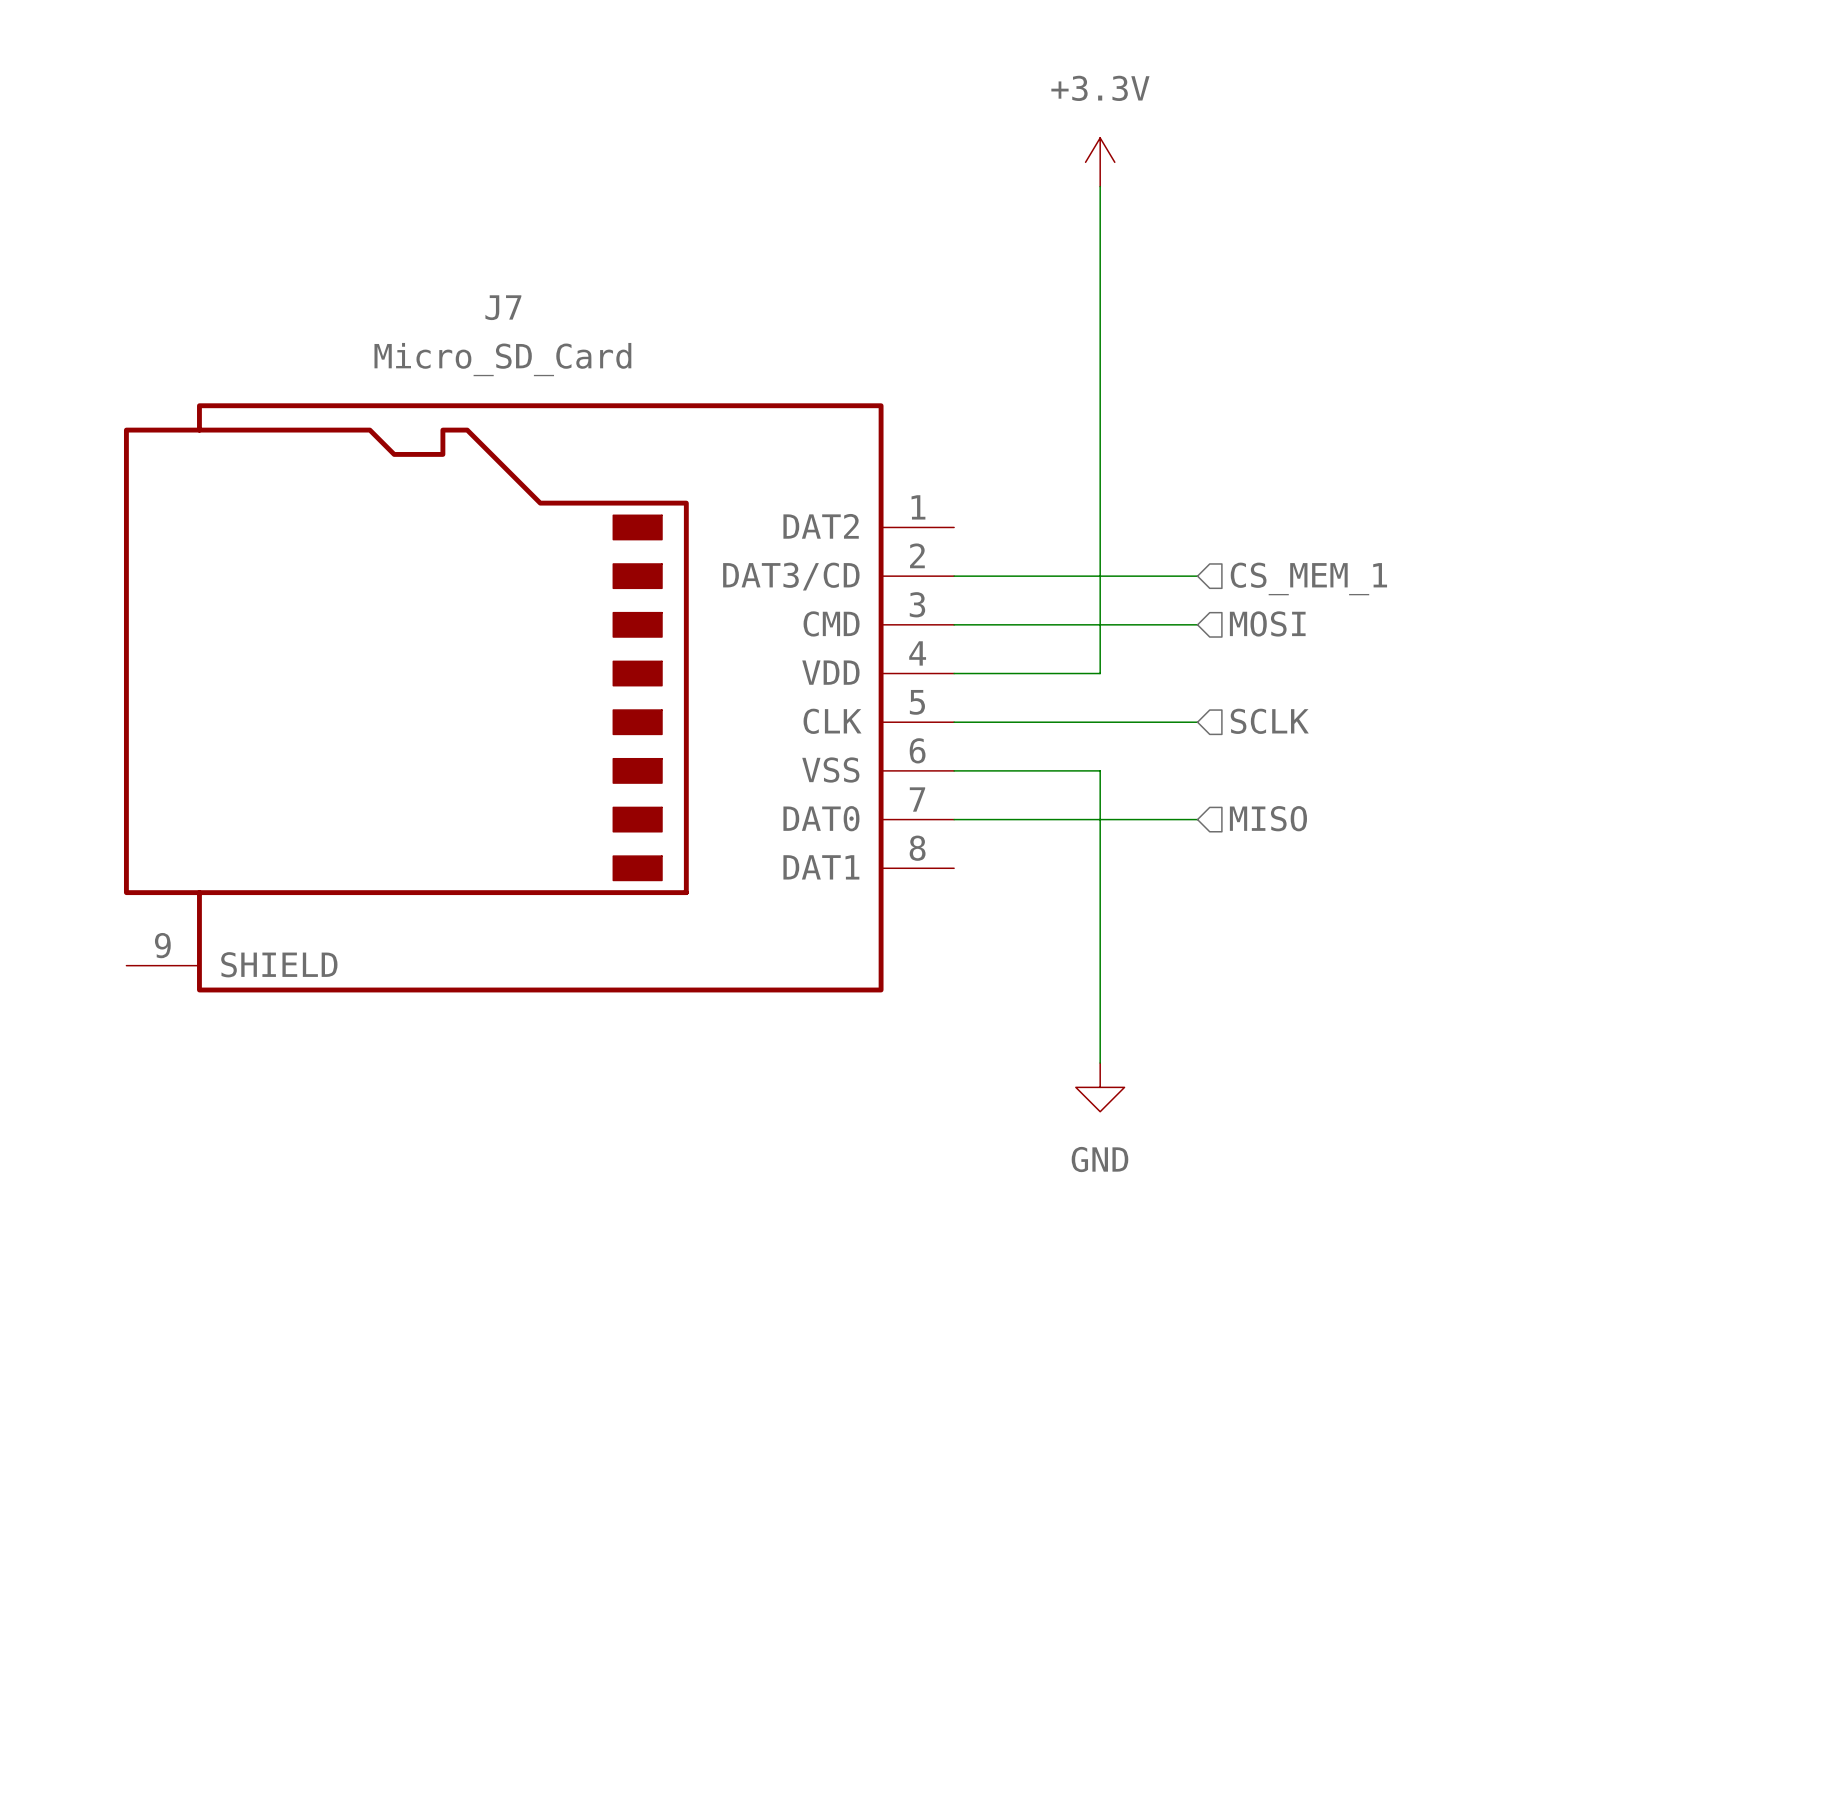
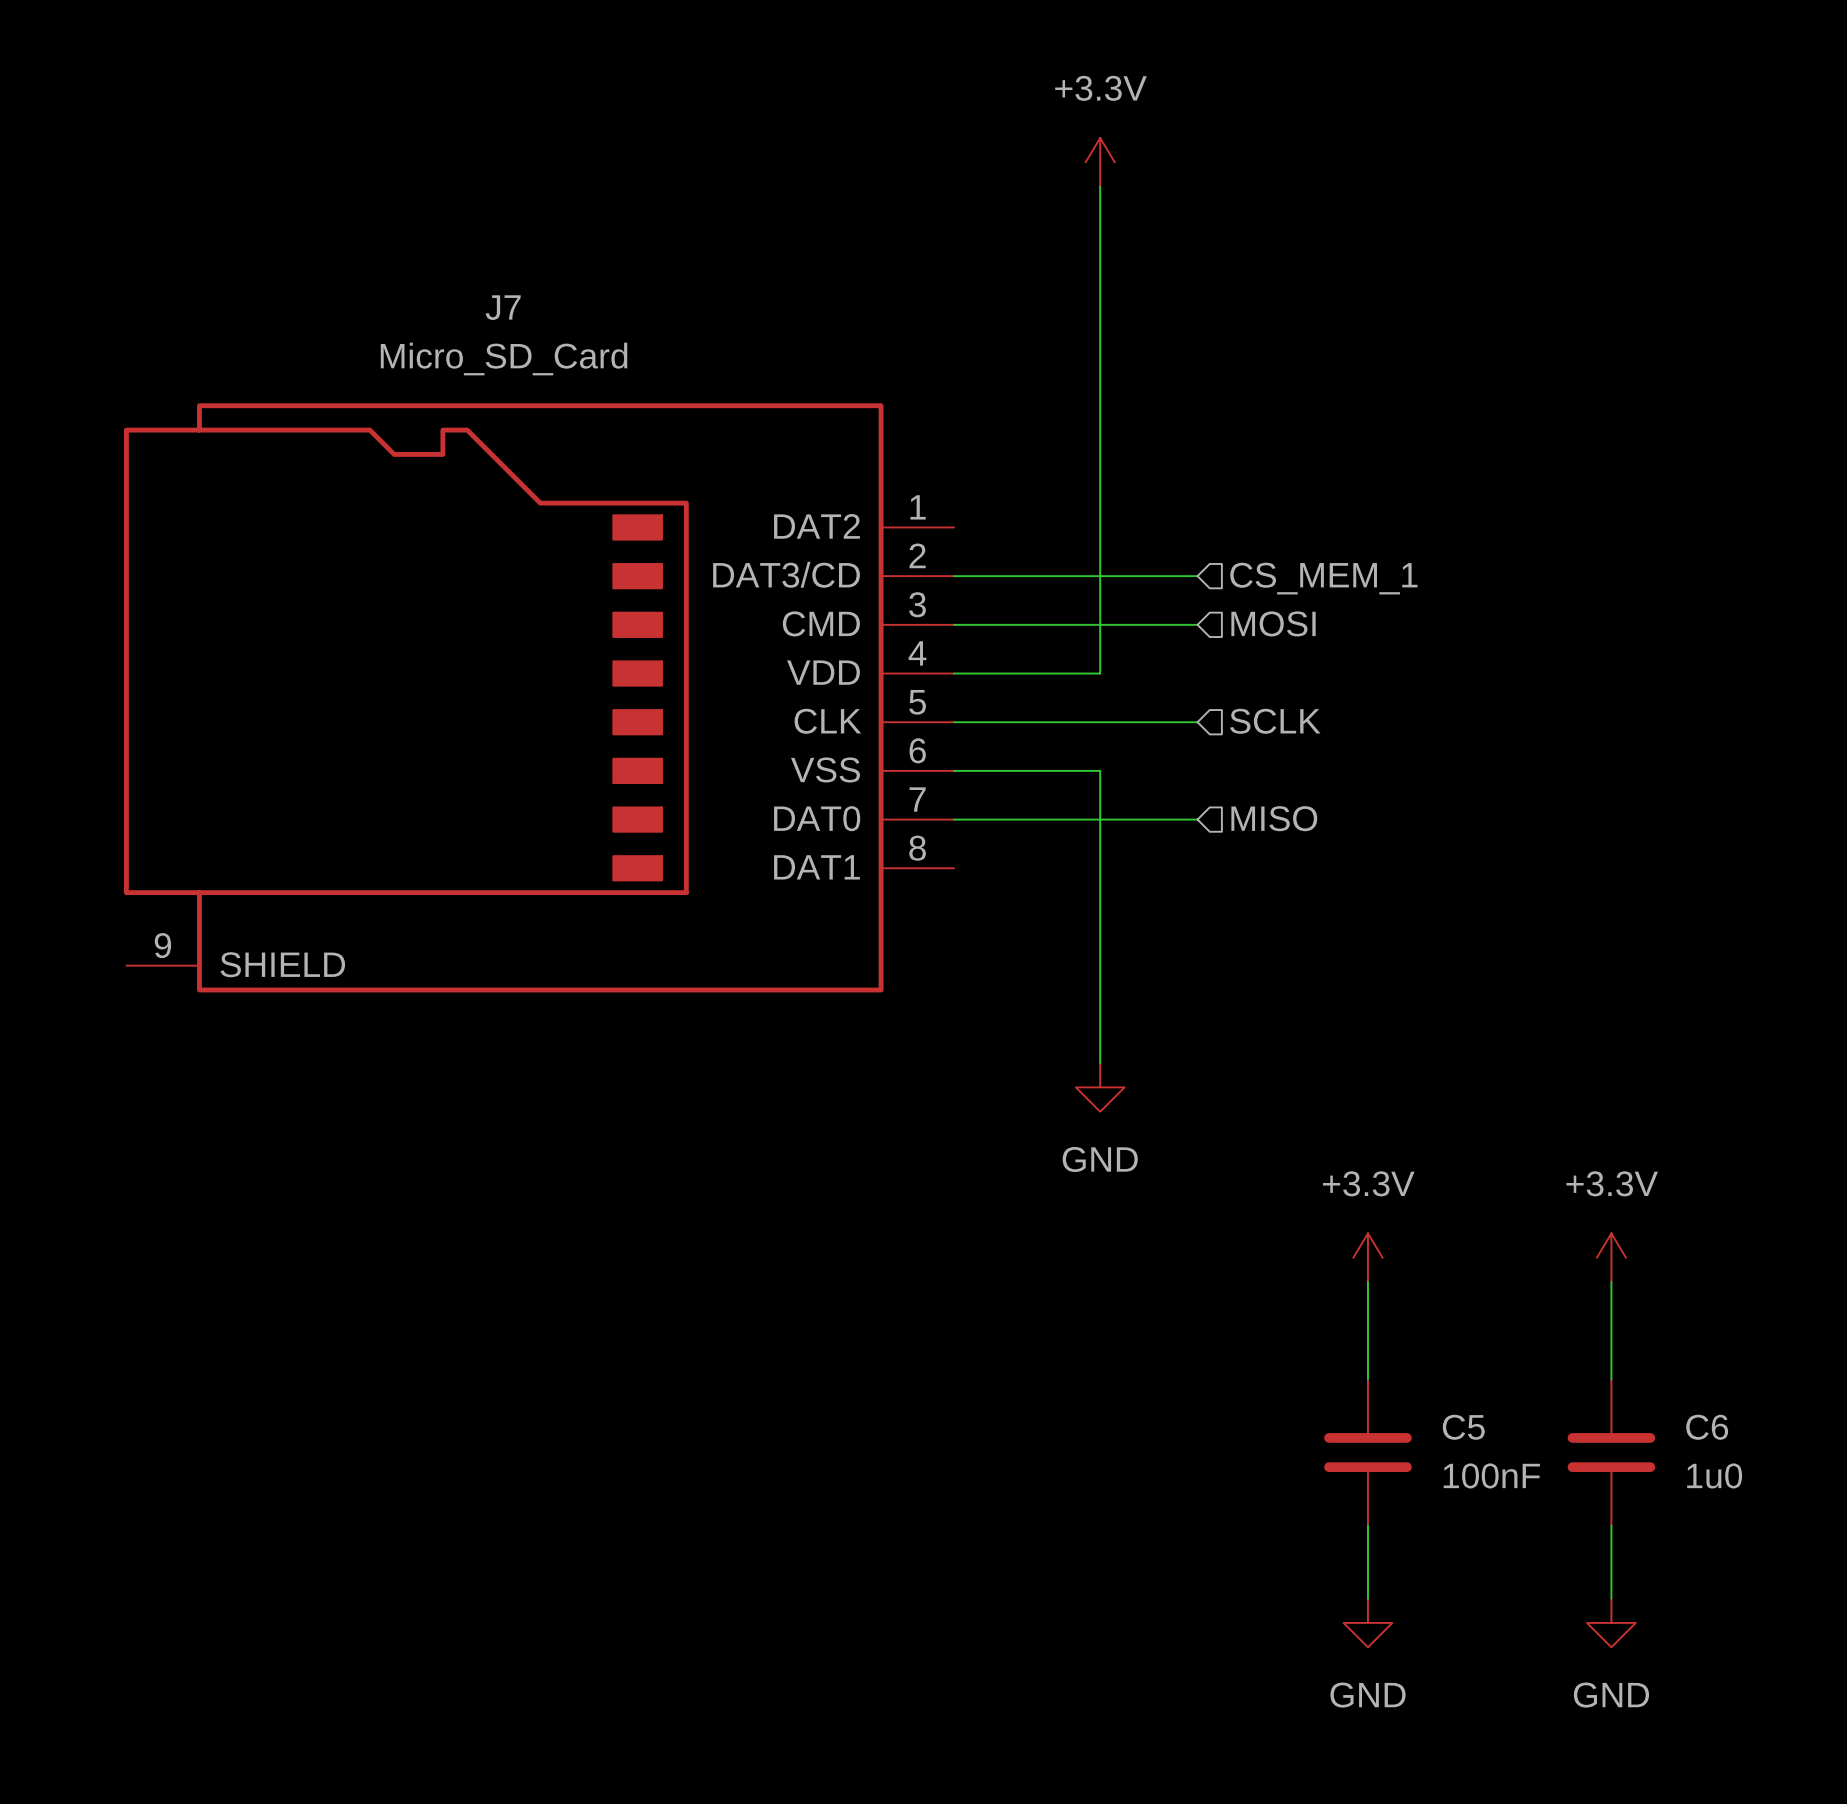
power symbol: none -> +3.3V (1367, 1257)
power symbol: none -> +3.3V (1611, 1257)
wire: none -> (1367, 1282) (1367, 1379)
wire: none -> (1611, 1282) (1611, 1379)
C5: none -> 100nF (1367, 1452)
C6: none -> 1u0 (1611, 1452)
wire: none -> (1367, 1525) (1367, 1598)
wire: none -> (1611, 1525) (1611, 1598)
power symbol: none -> GND (1367, 1622)
power symbol: none -> GND (1611, 1622)

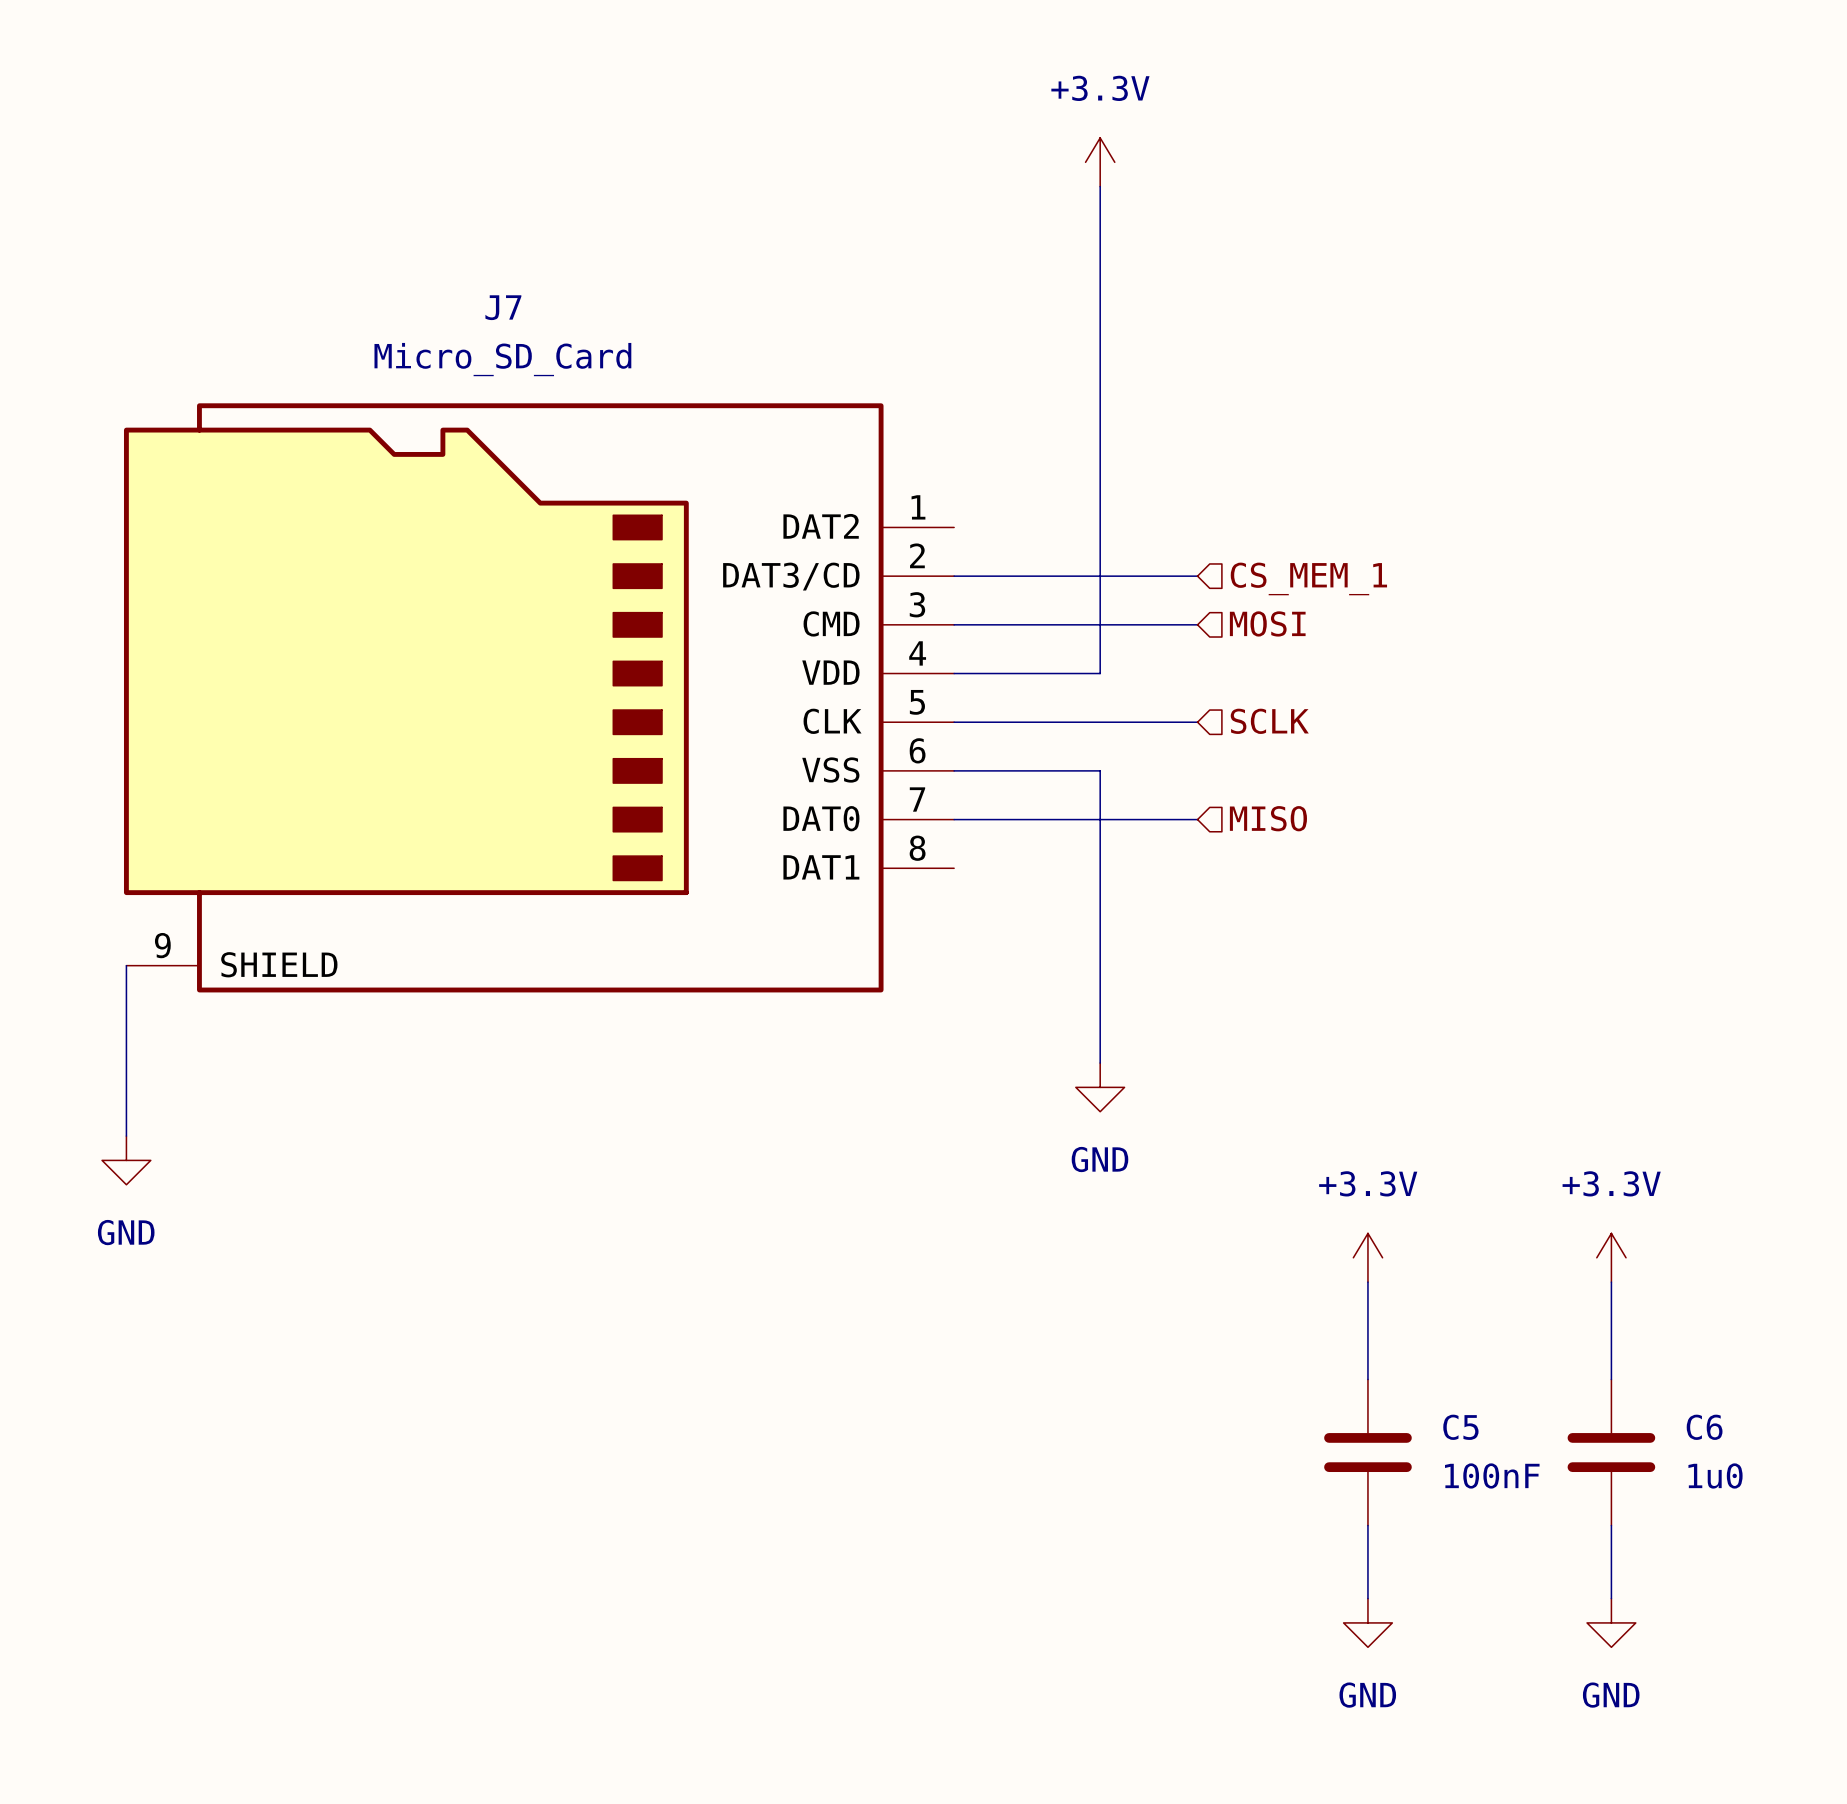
wire: none -> (126, 965) (126, 1136)
power symbol: none -> GND (126, 1160)

